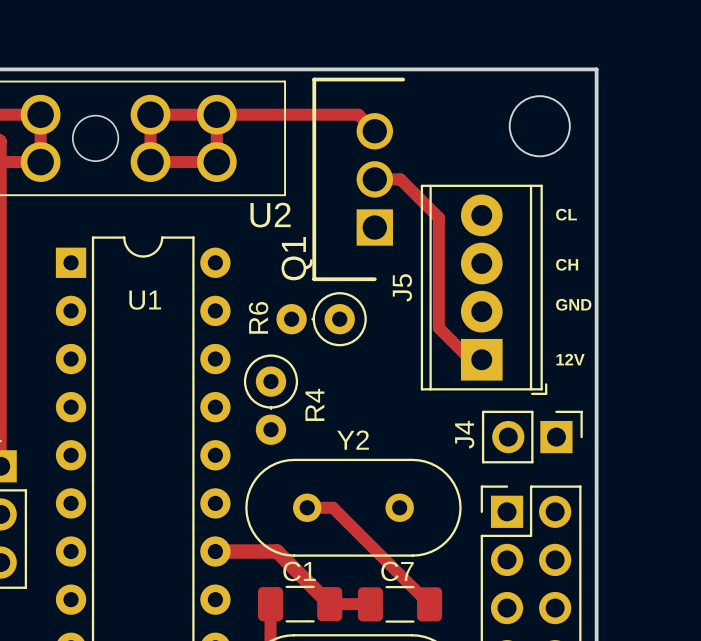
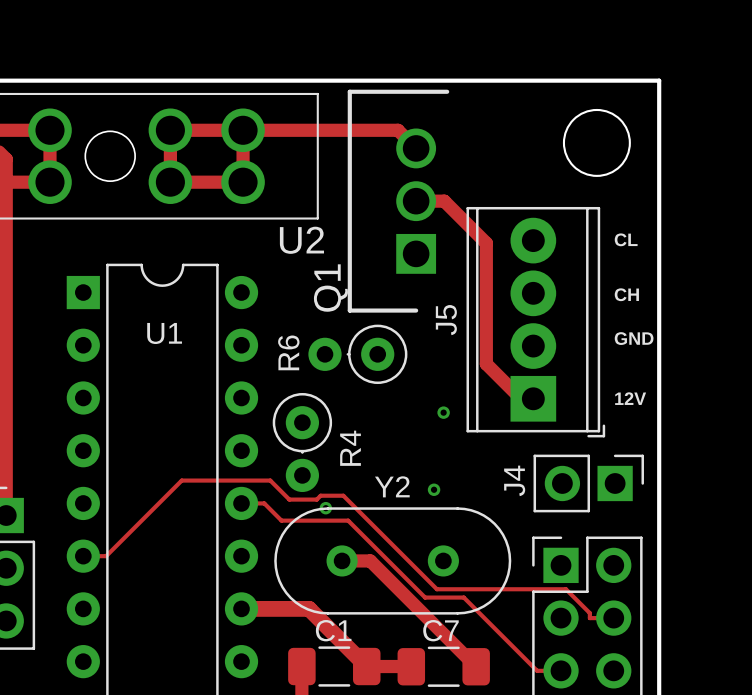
via: none -> (443, 412)
via: none -> (434, 489)
track: none -> (241, 503) (264, 503) (281, 520) (348, 520) (425, 597) (463, 597) (537, 670) (561, 670)
via: none -> (325, 508)
track: none -> (83, 556) (106, 556) (181, 480) (270, 480) (289, 499) (316, 499) (320, 495) (343, 495) (436, 589) (565, 589) (589, 613) (589, 618) (613, 618)

